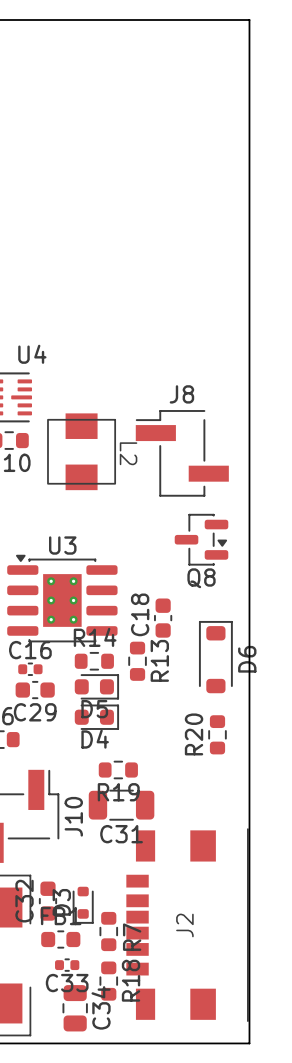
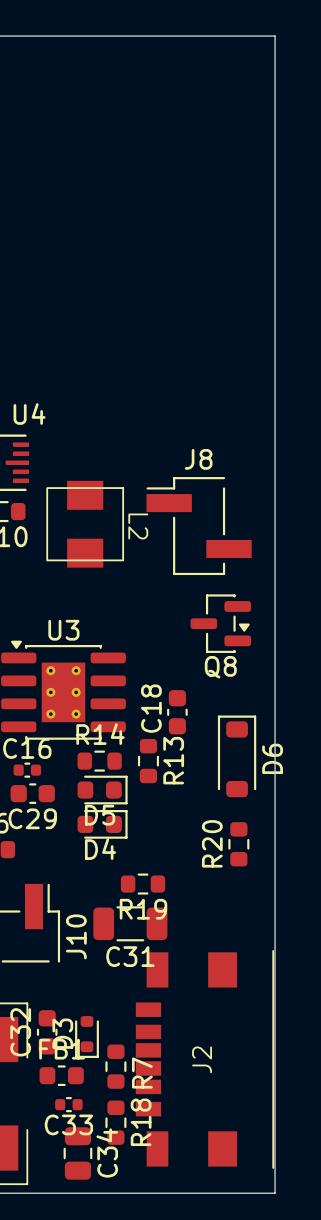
R19 position: (118, 770) -> (143, 884)

